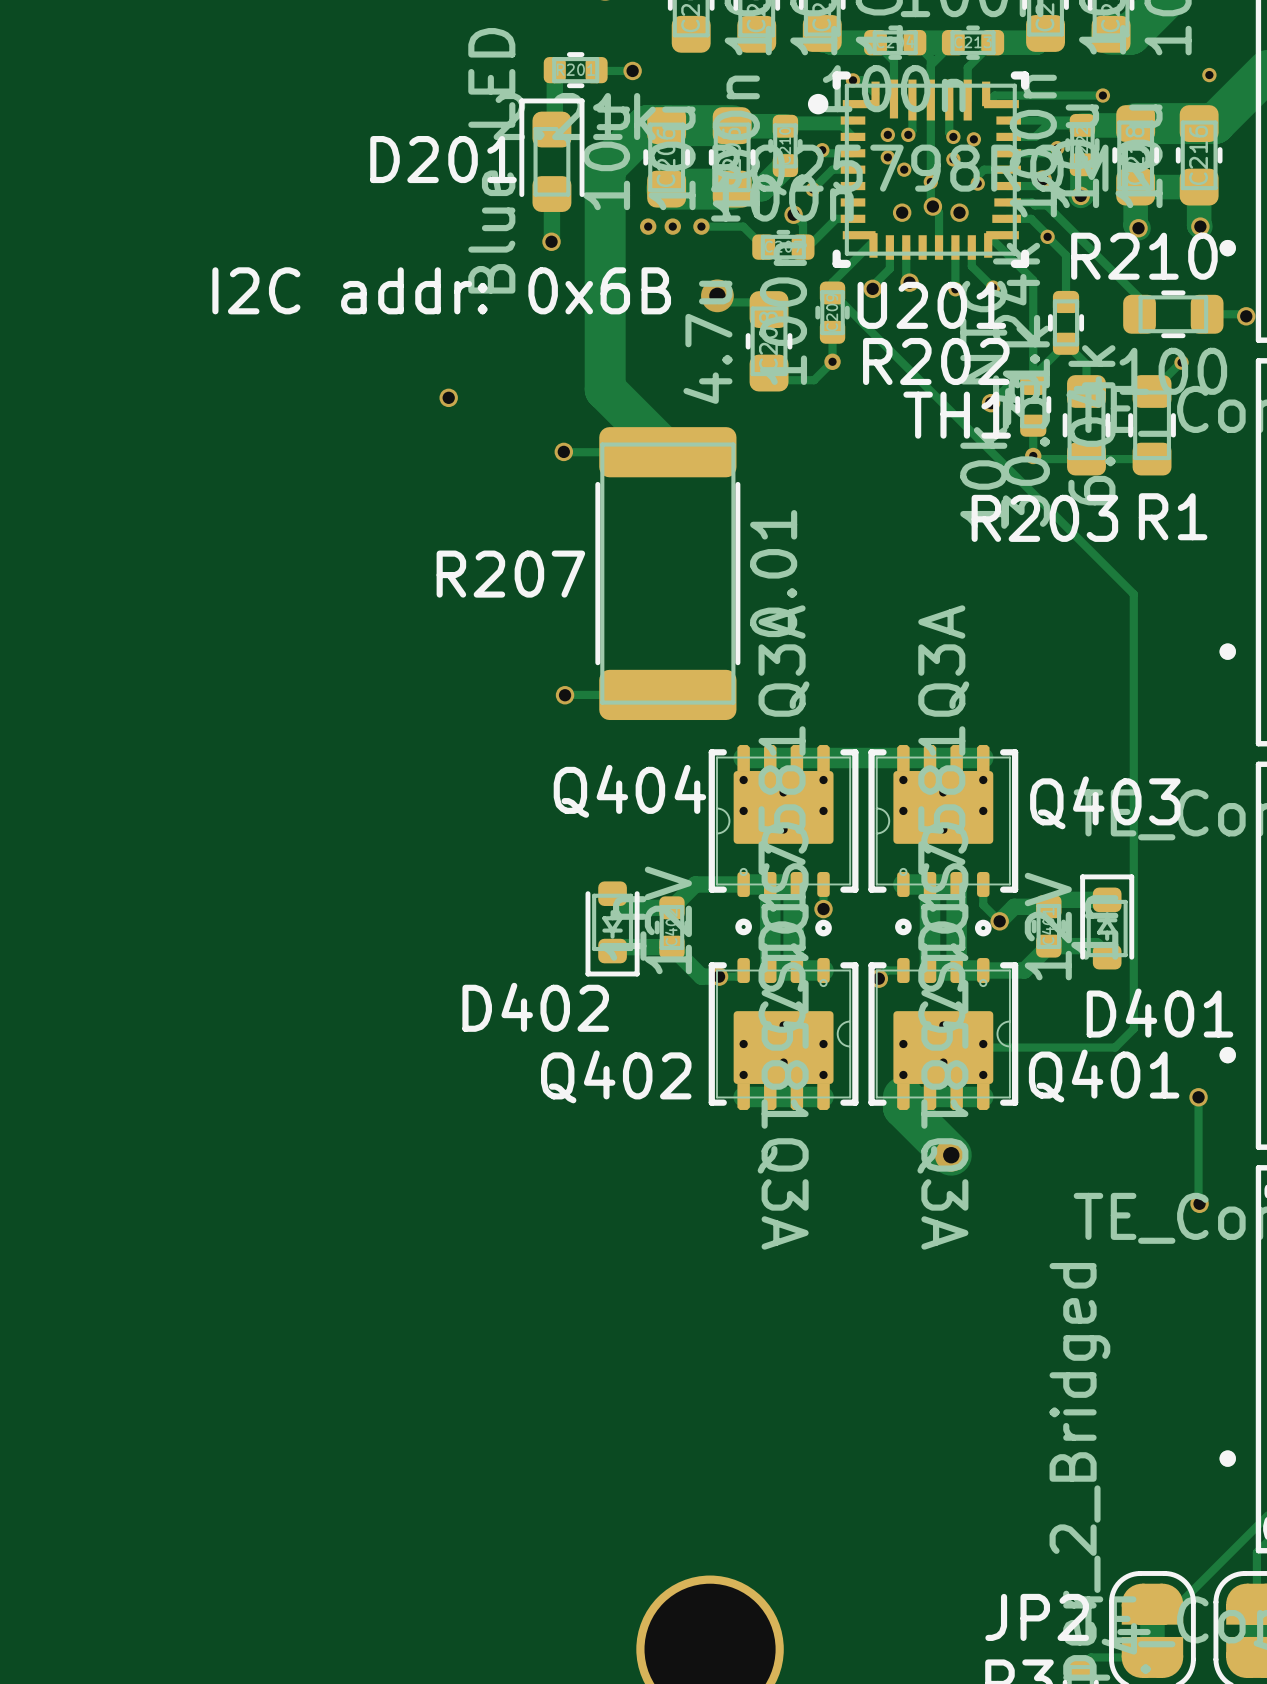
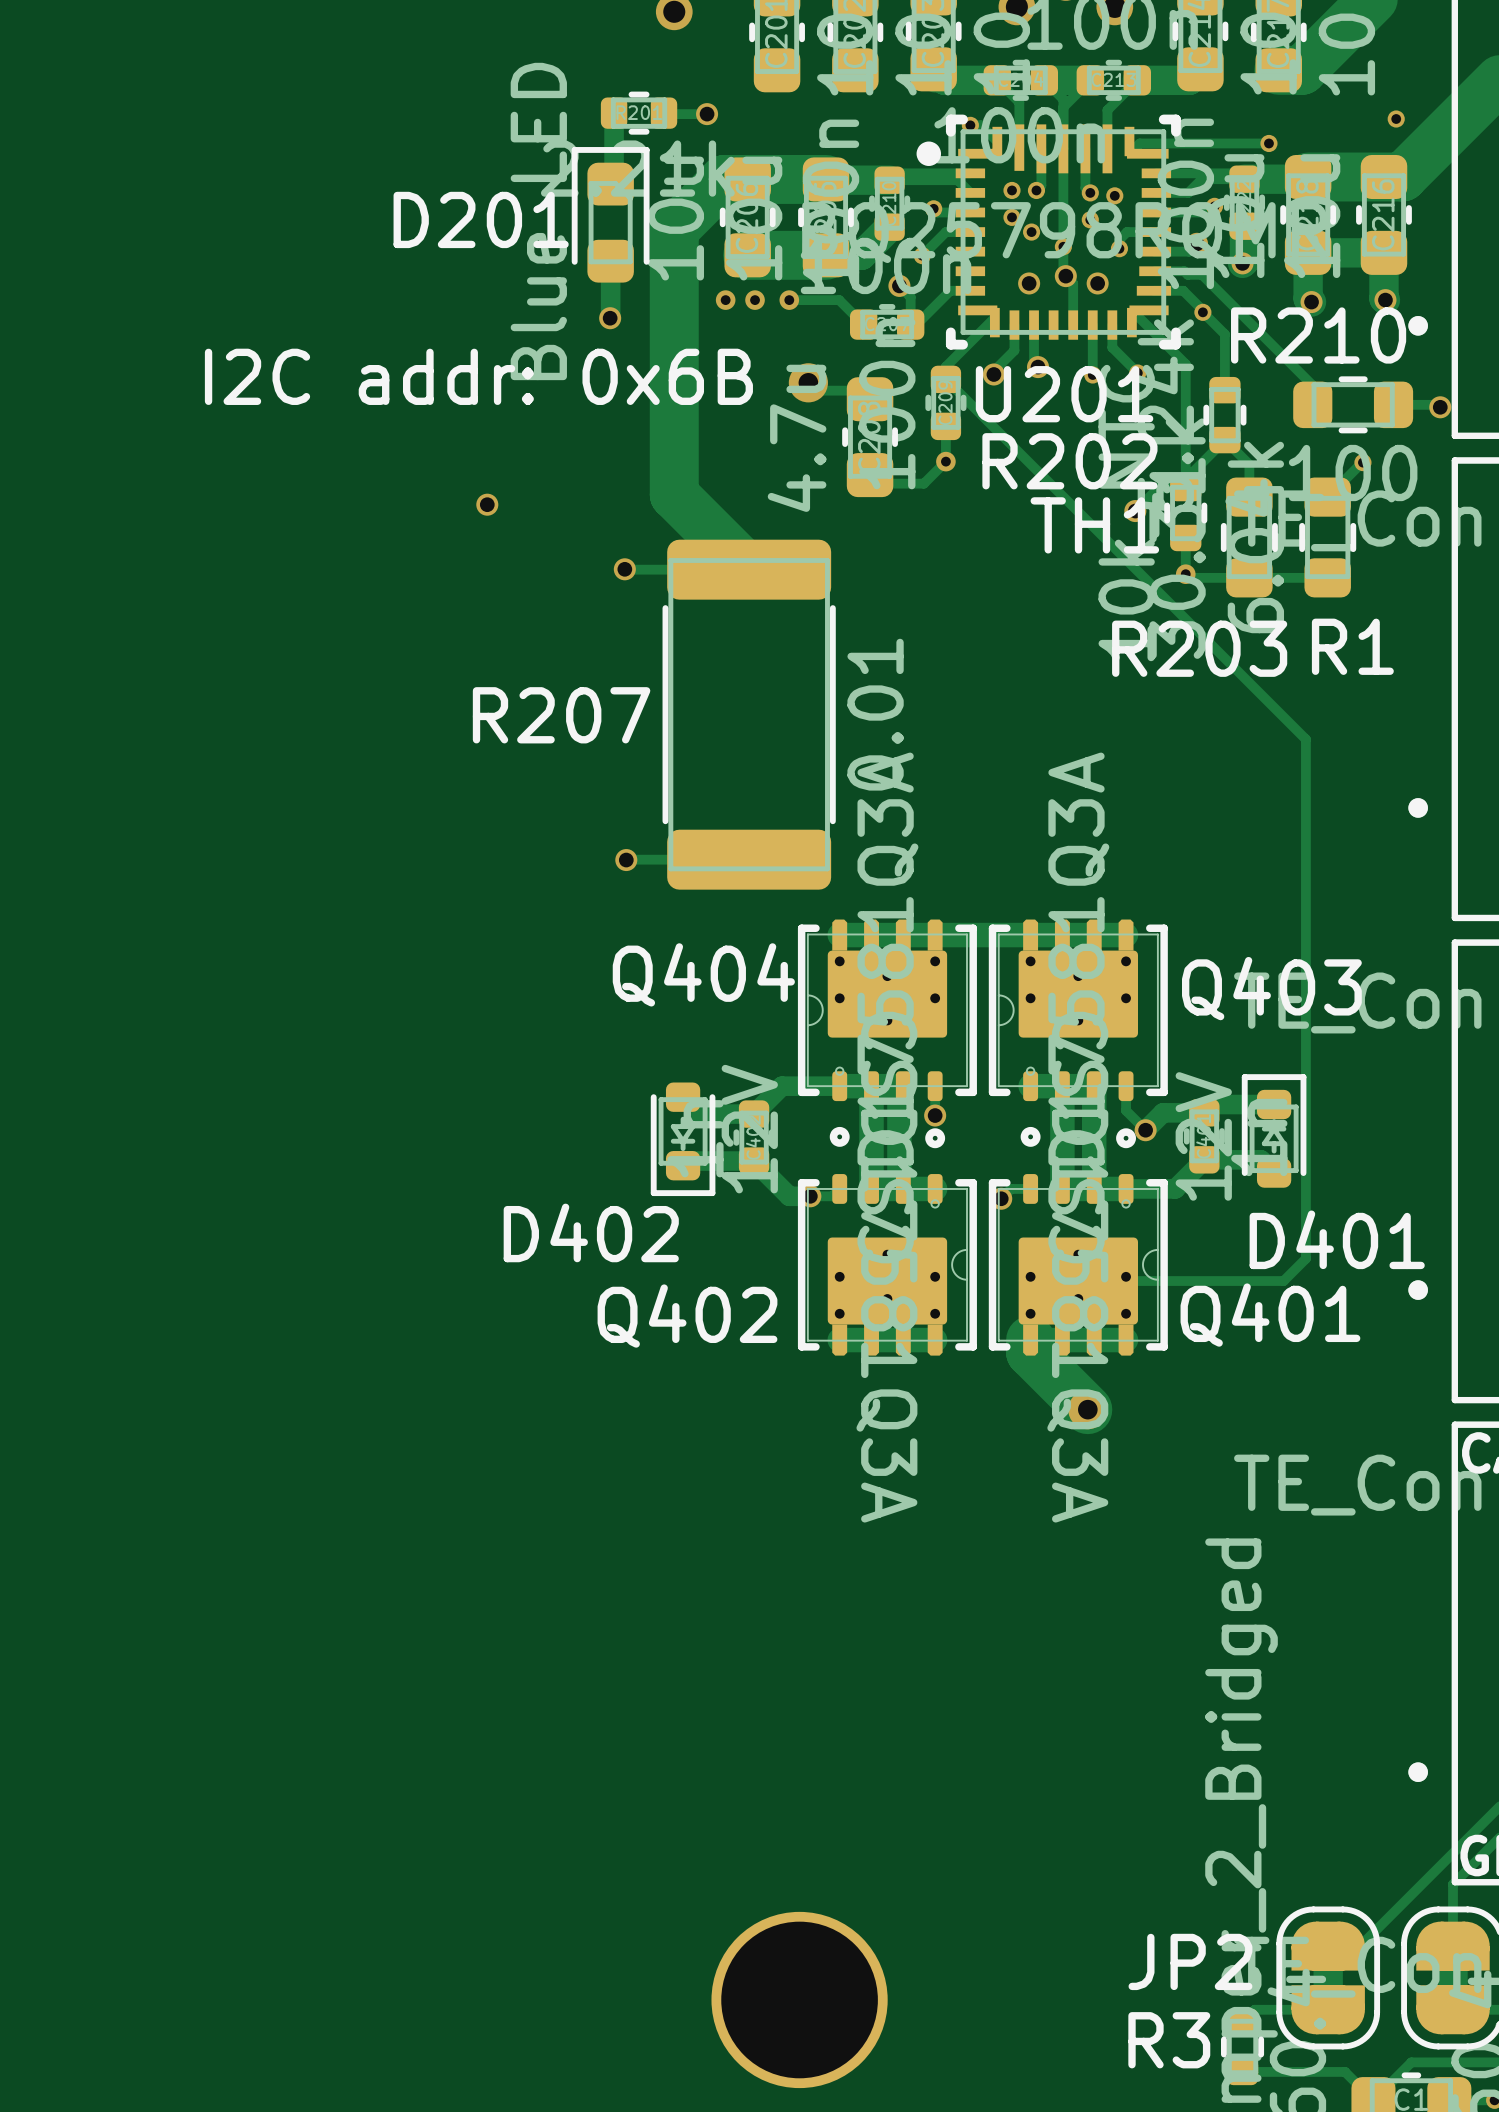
track: (1198, 1097) (1198, 1202) -> none
via: (1198, 1097) -> none
via: (1199, 1203) -> none

